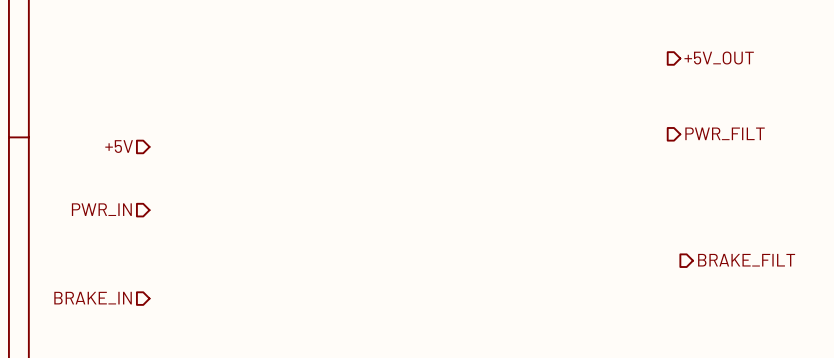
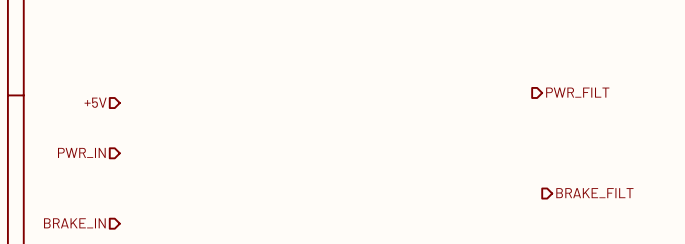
hierarchical label: +5V_OUT (719, 58) -> none

